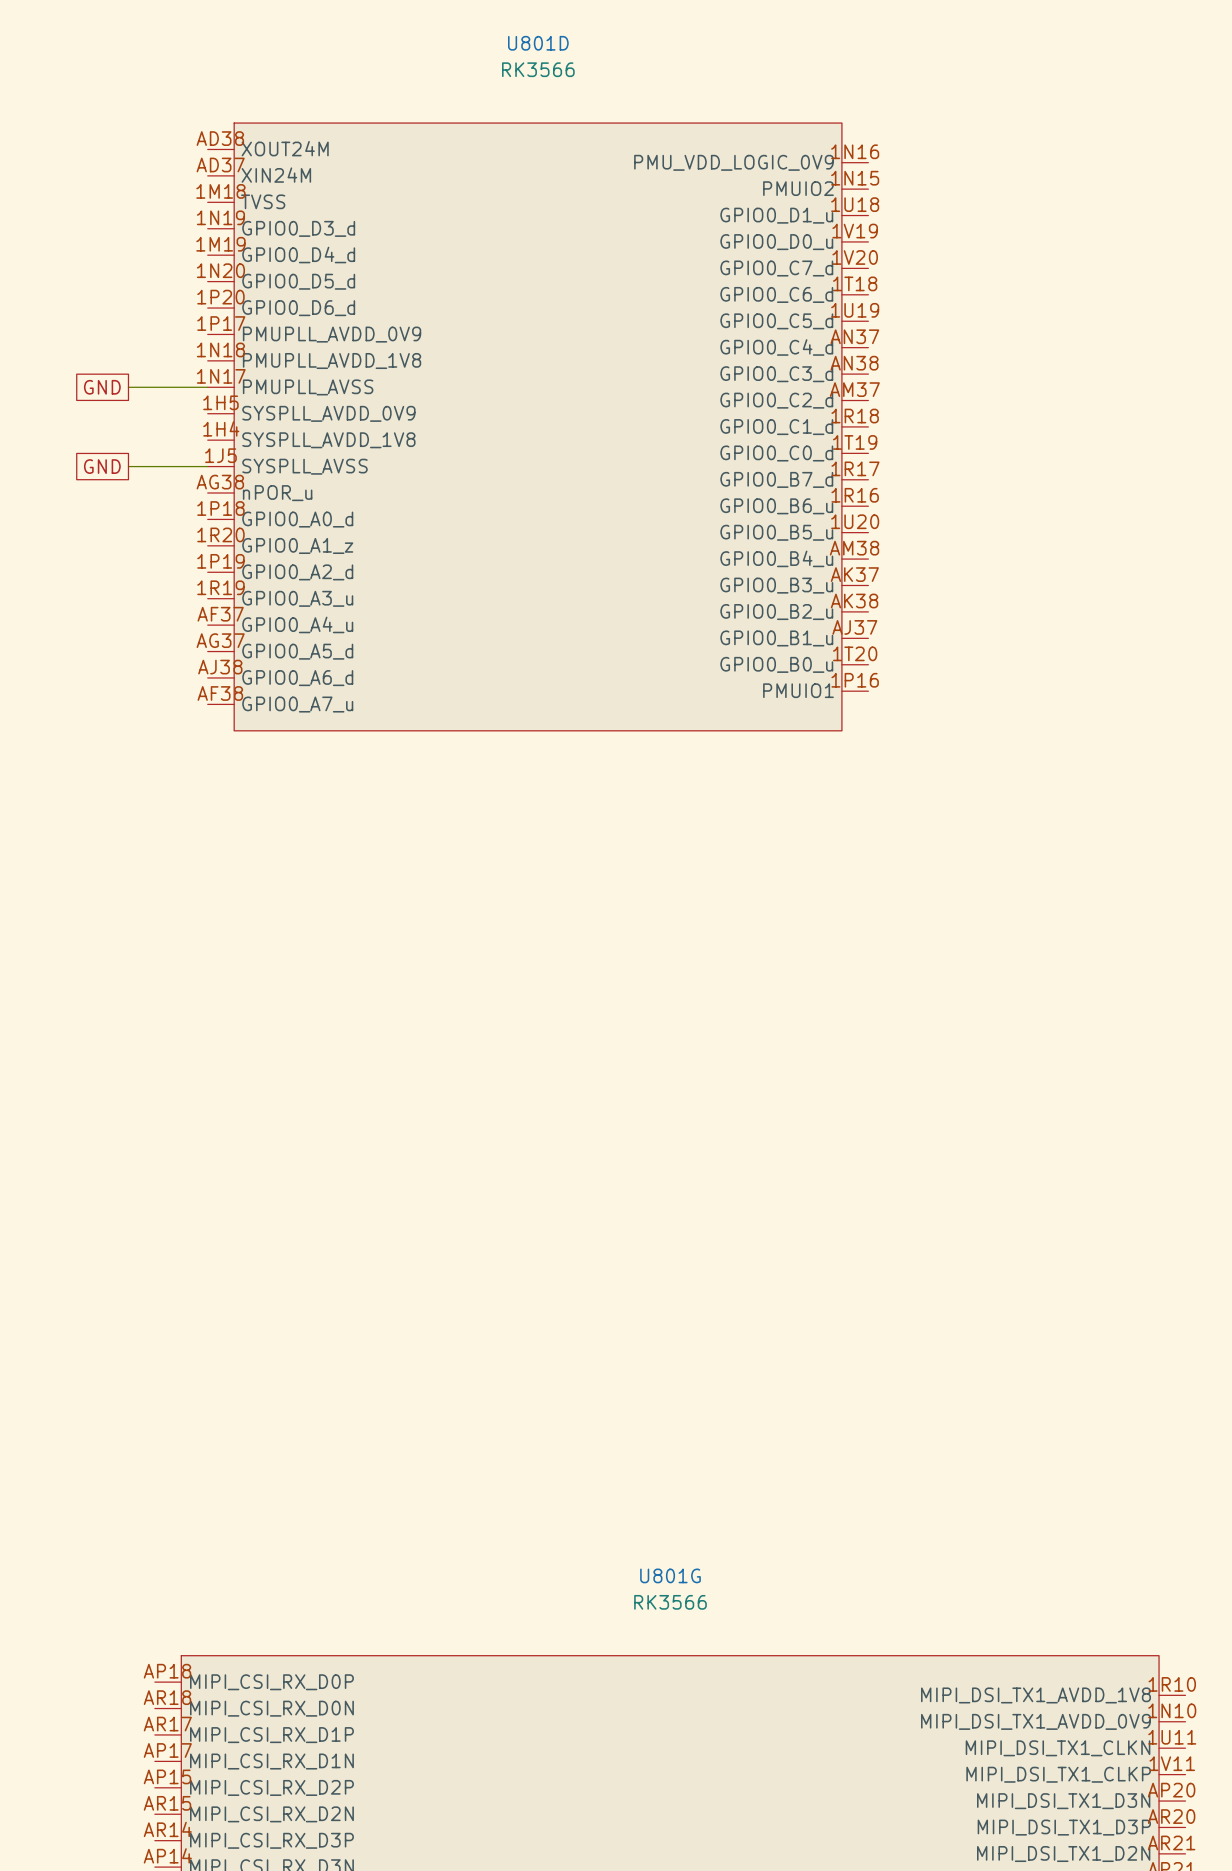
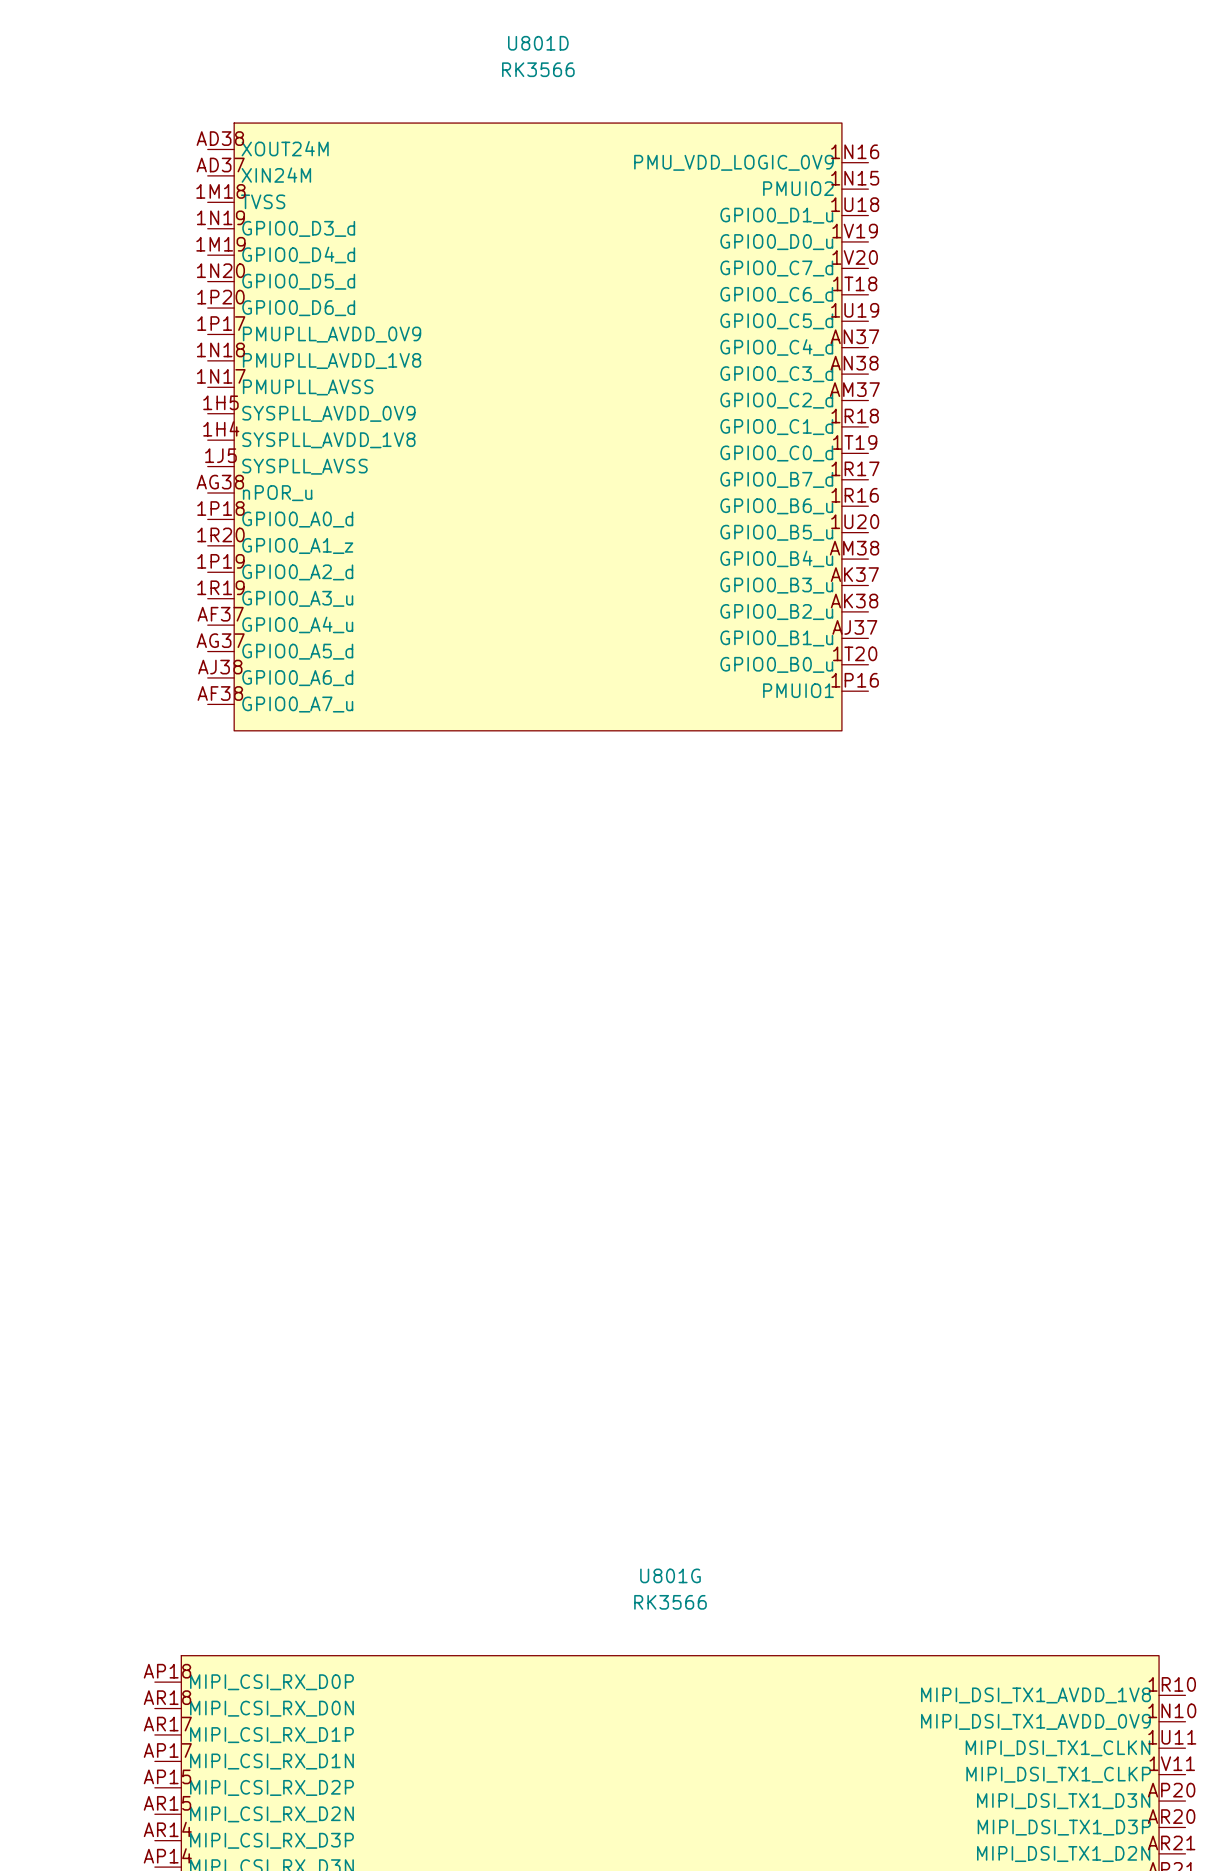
global label: GND (102, 387) -> none
wire: (128, 387) (207, 387) -> none
global label: GND (102, 466) -> none
wire: (128, 466) (207, 466) -> none

